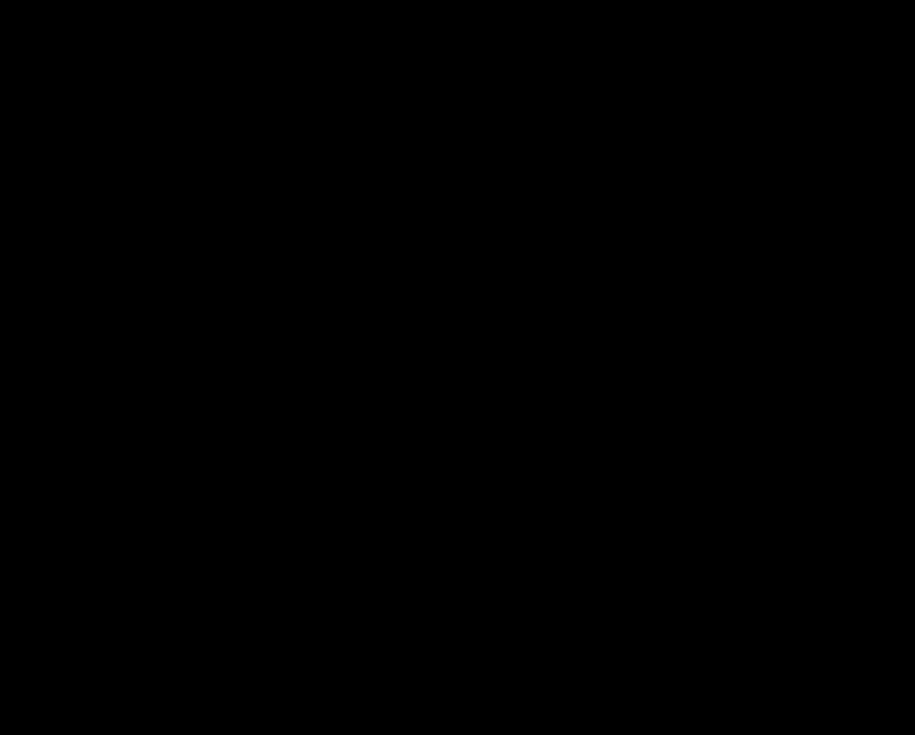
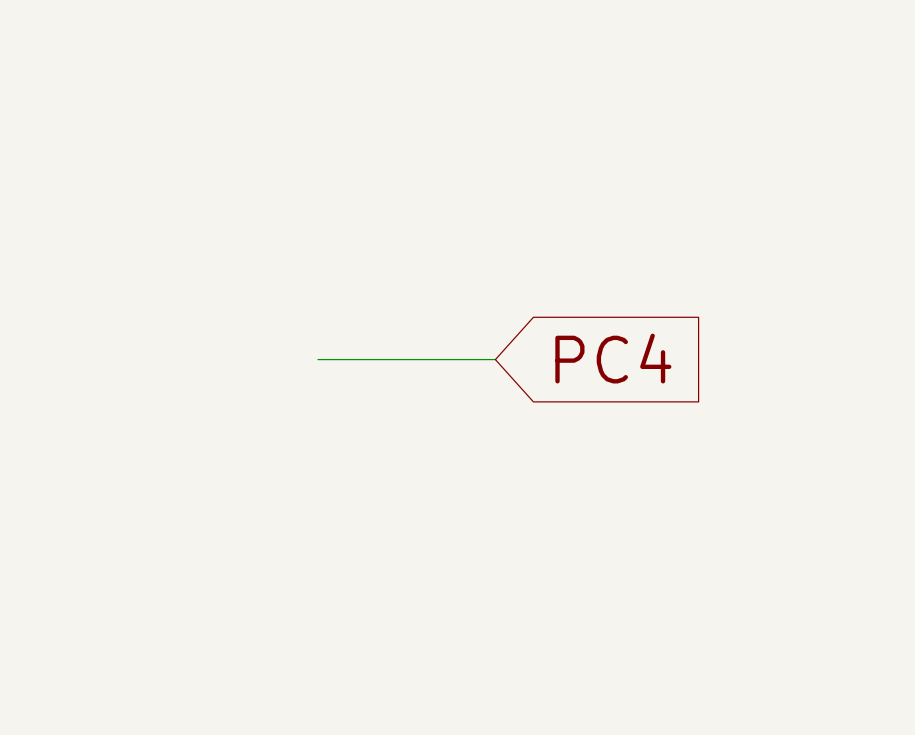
global label: none -> PC4 (613, 358)
wire: none -> (317, 359) (495, 359)

